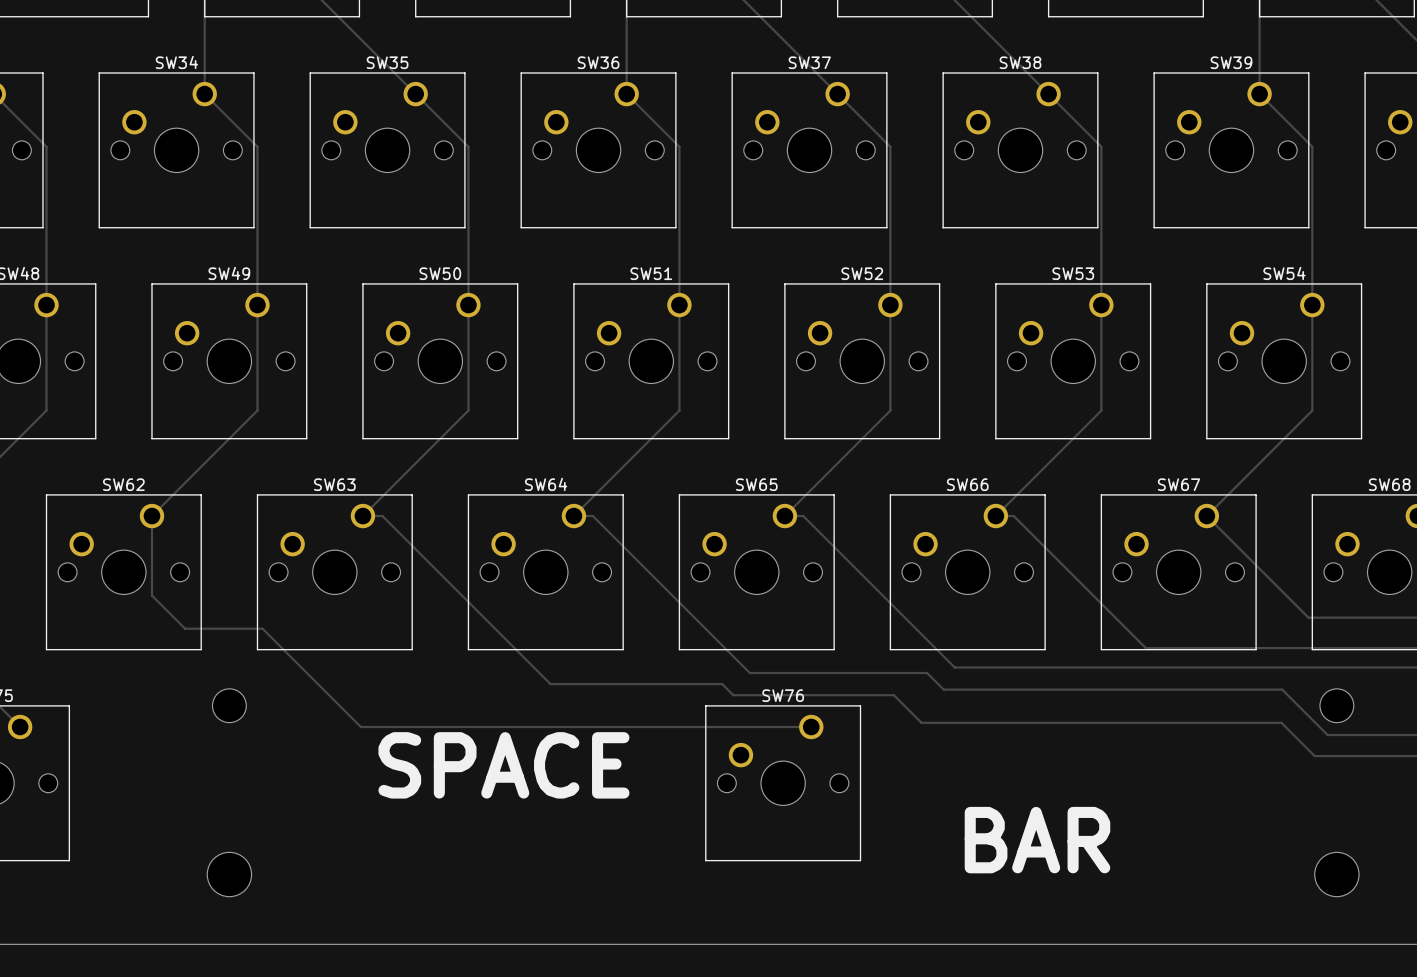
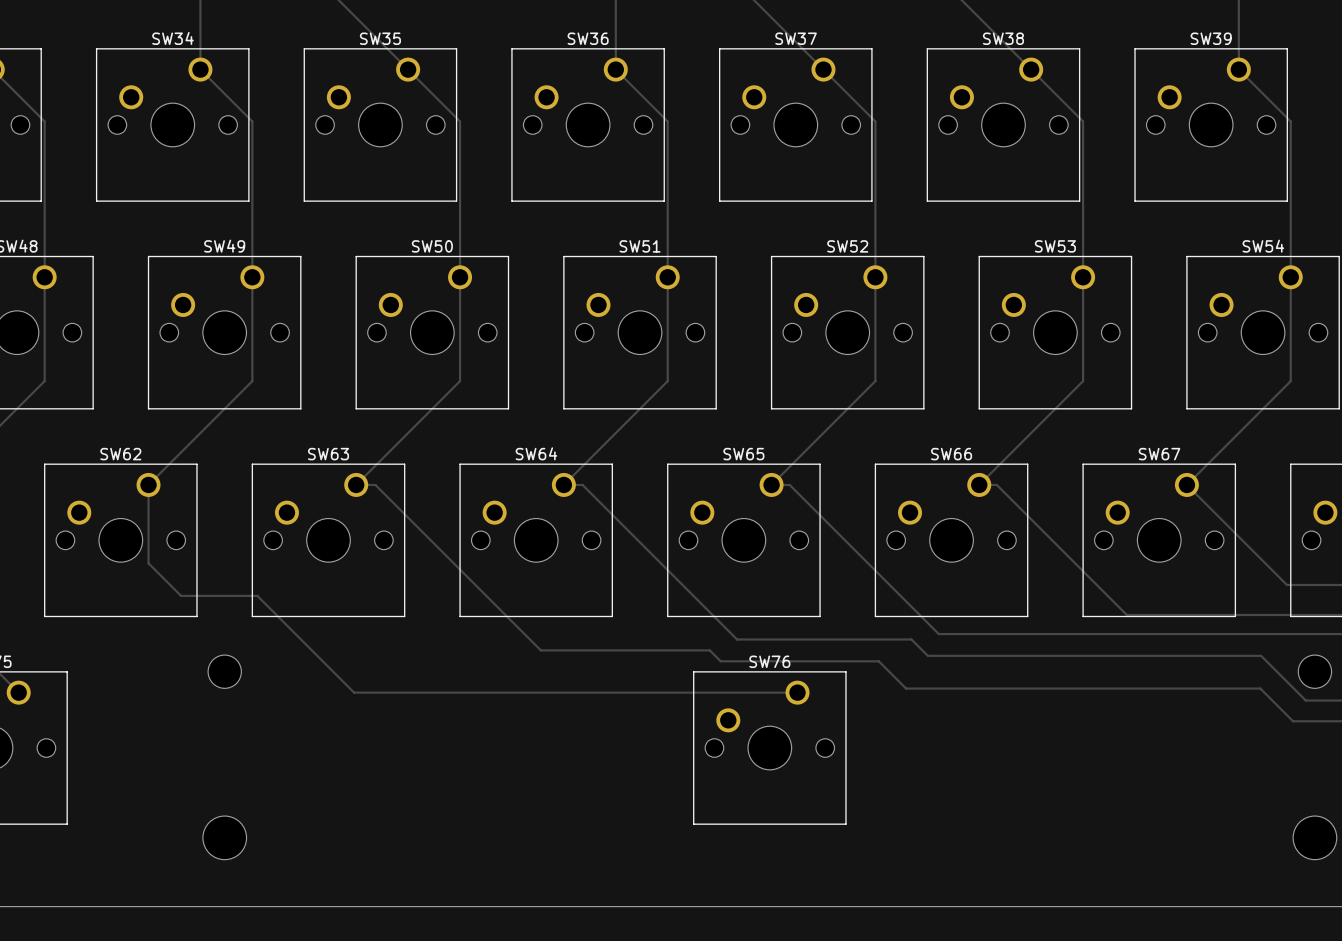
text: SPACE (503, 765) -> none
text: BAR (1037, 840) -> none

